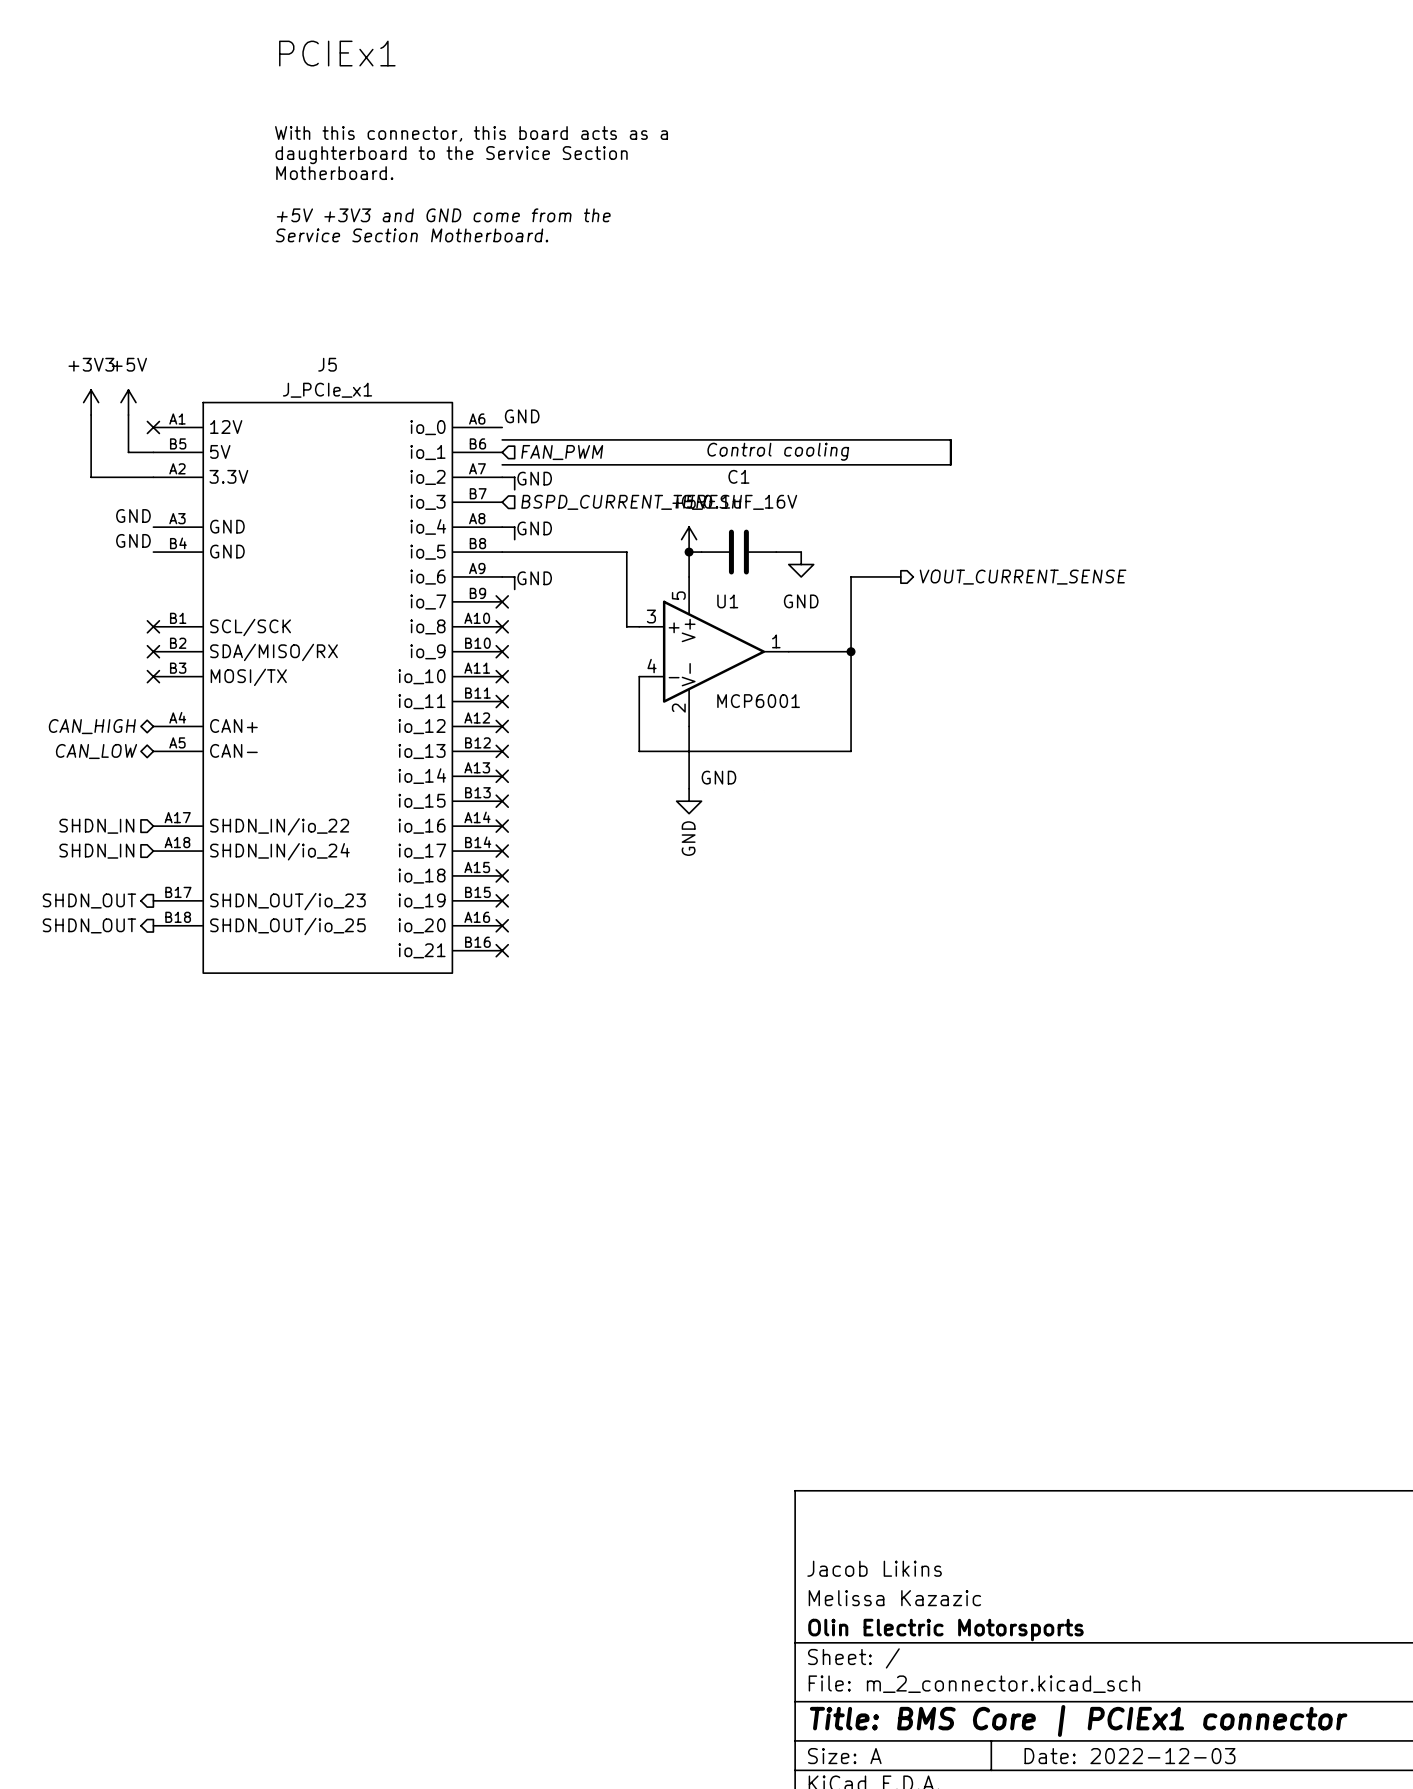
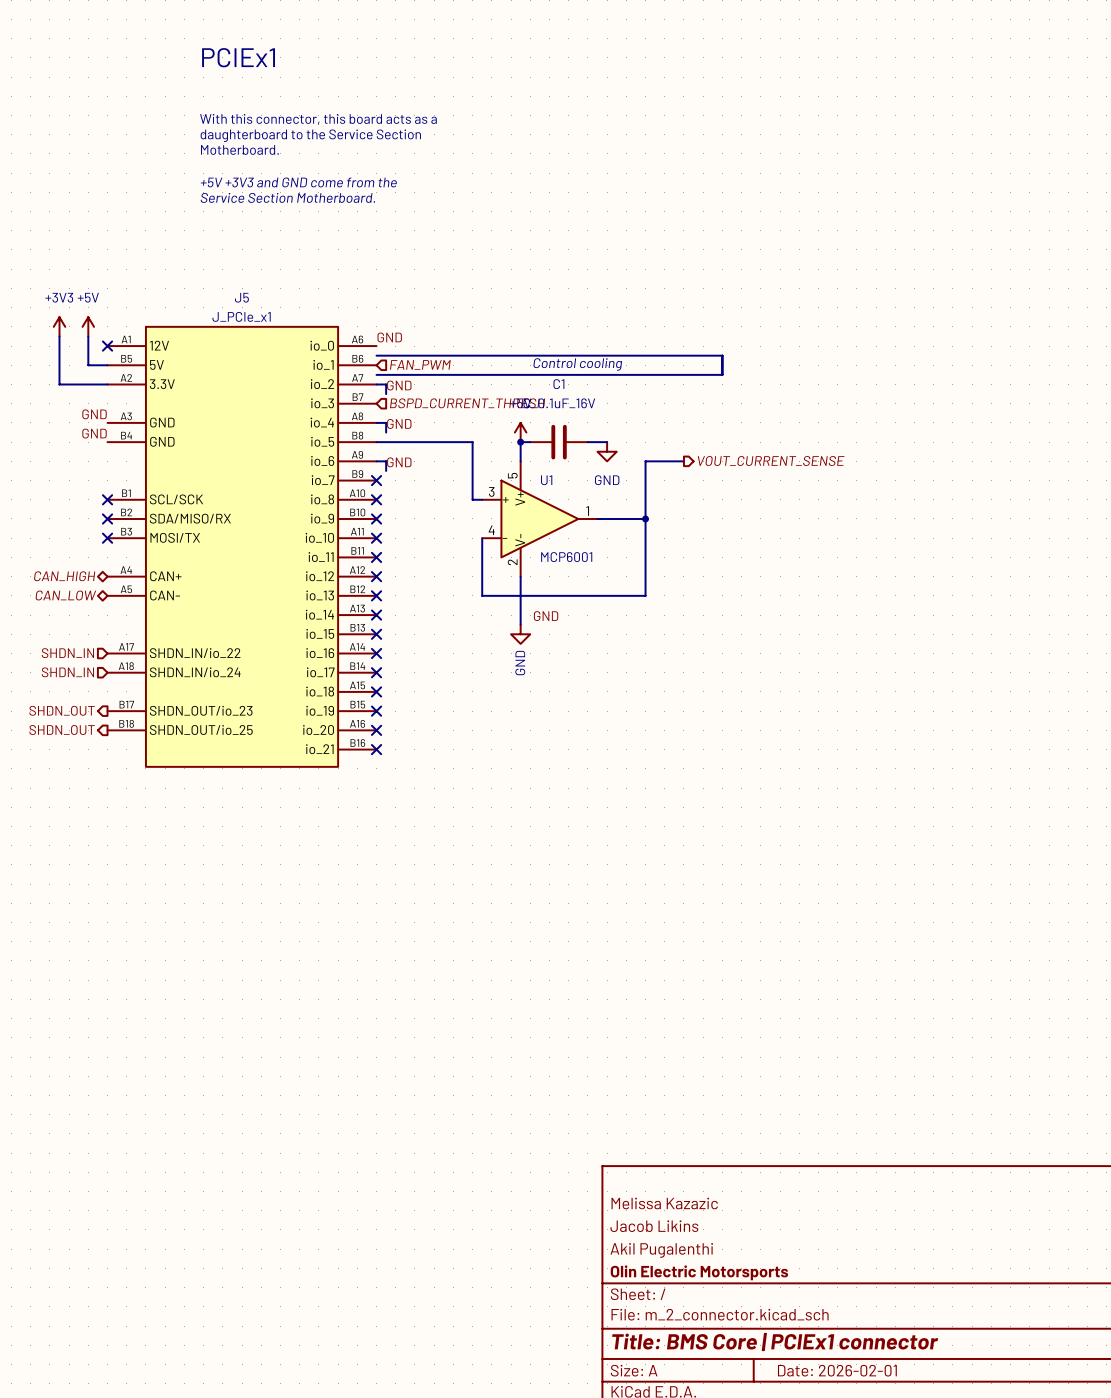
title block: none -> Melissa Kazazic (664, 1203)
title block: Melissa Kazazic (894, 1598) -> Akil Pugalenthi (661, 1250)
title block: Date: 2022-12-03 (1129, 1756) -> Date: 2026-02-01 (837, 1370)

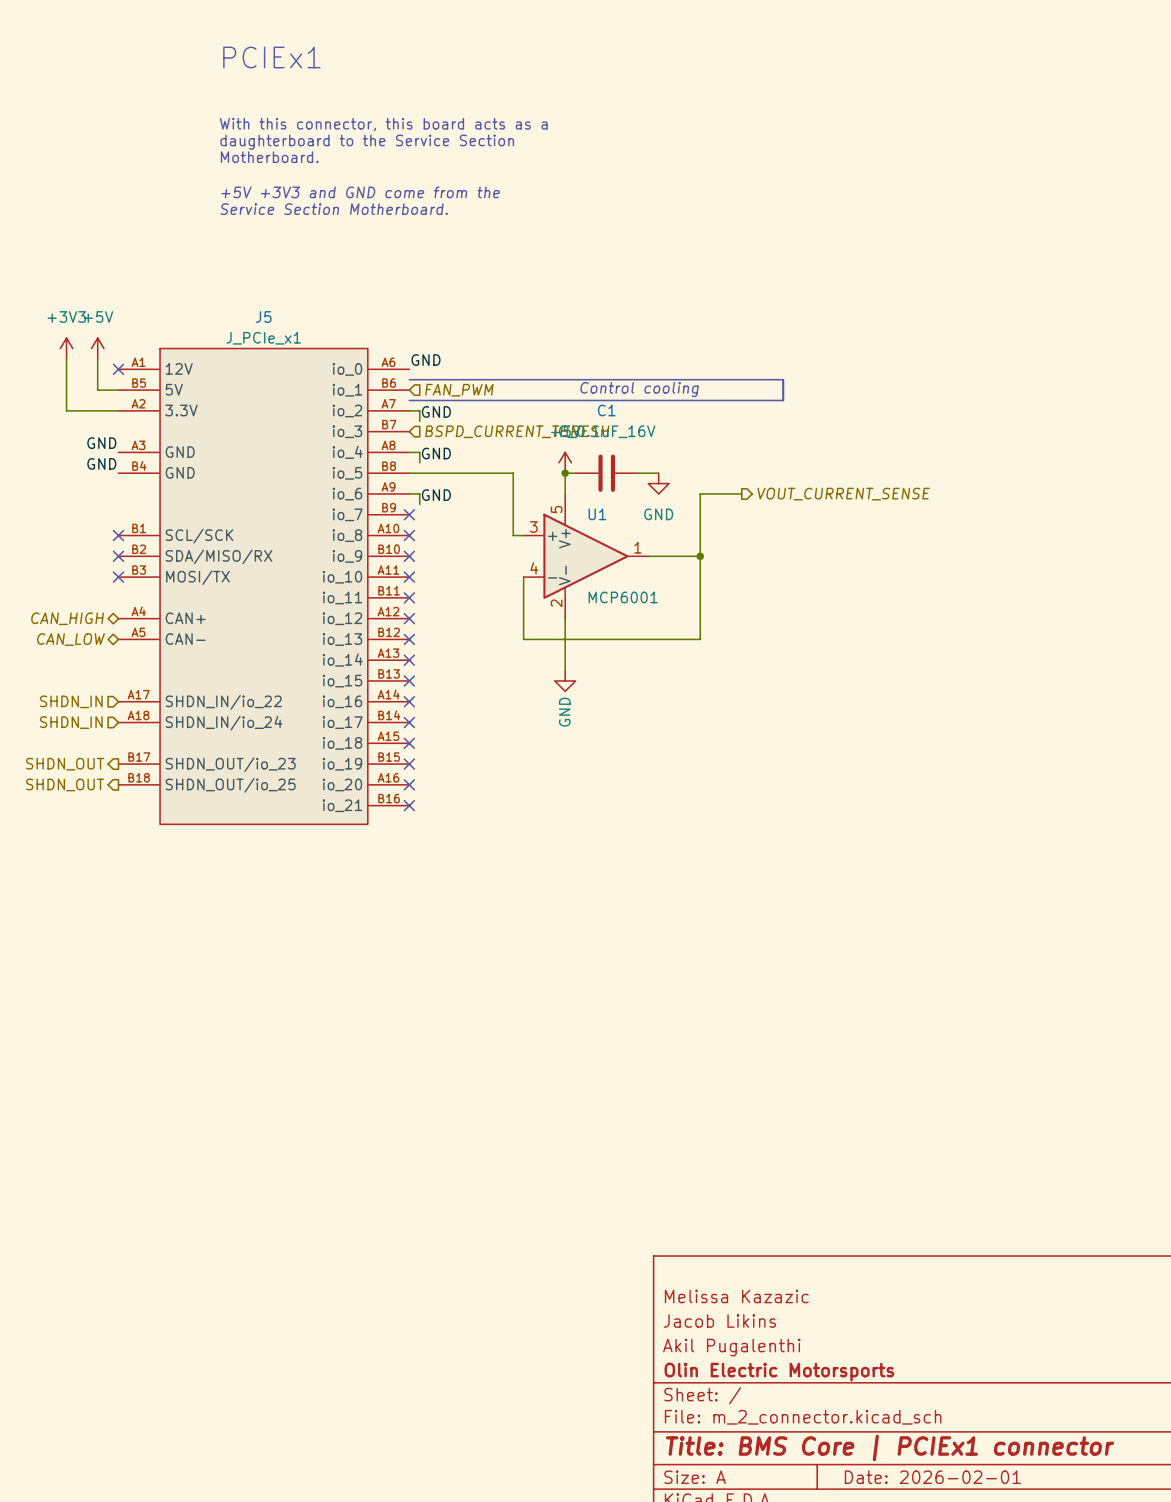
label: GND (546, 616) -> none

